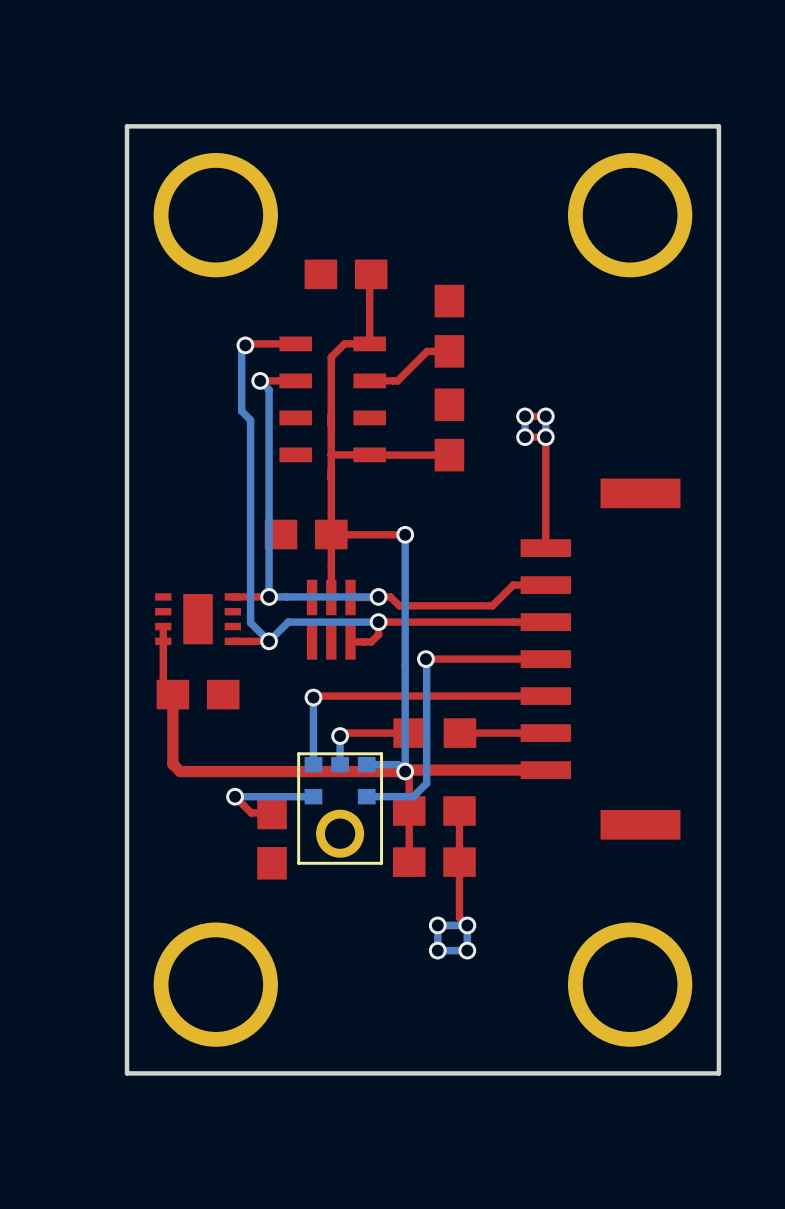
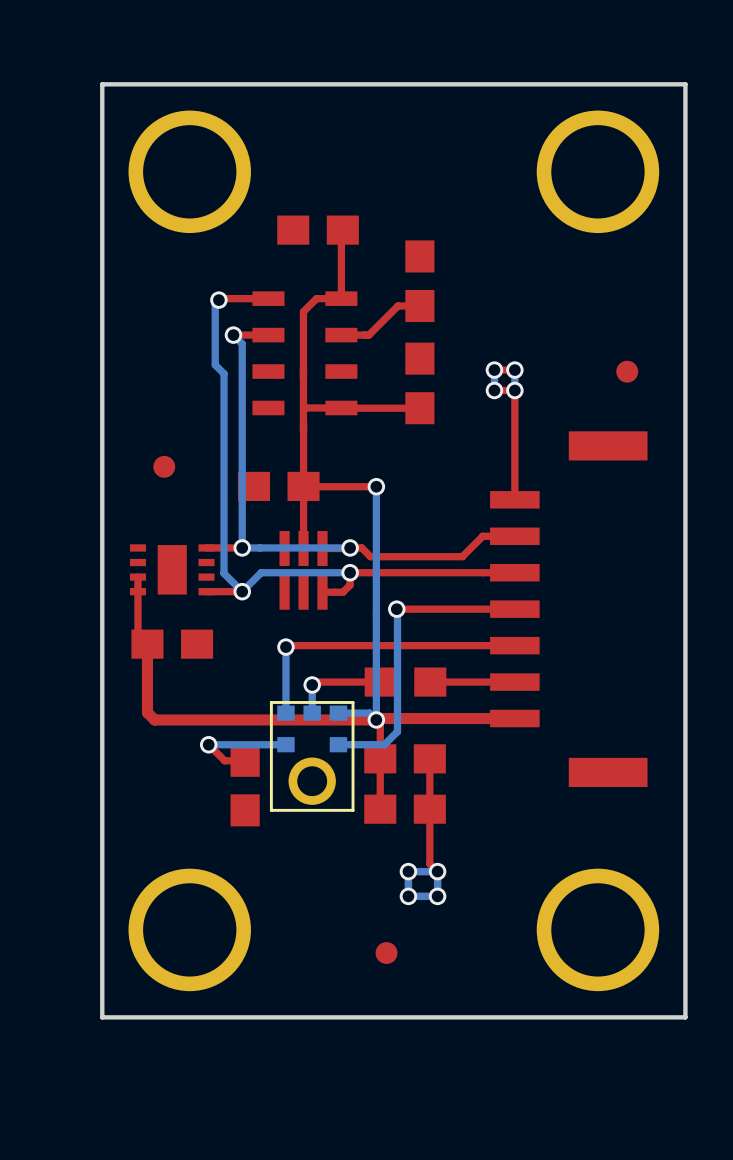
part: none -> (627, 371)
part: none -> (164, 466)
part: none -> (386, 953)

